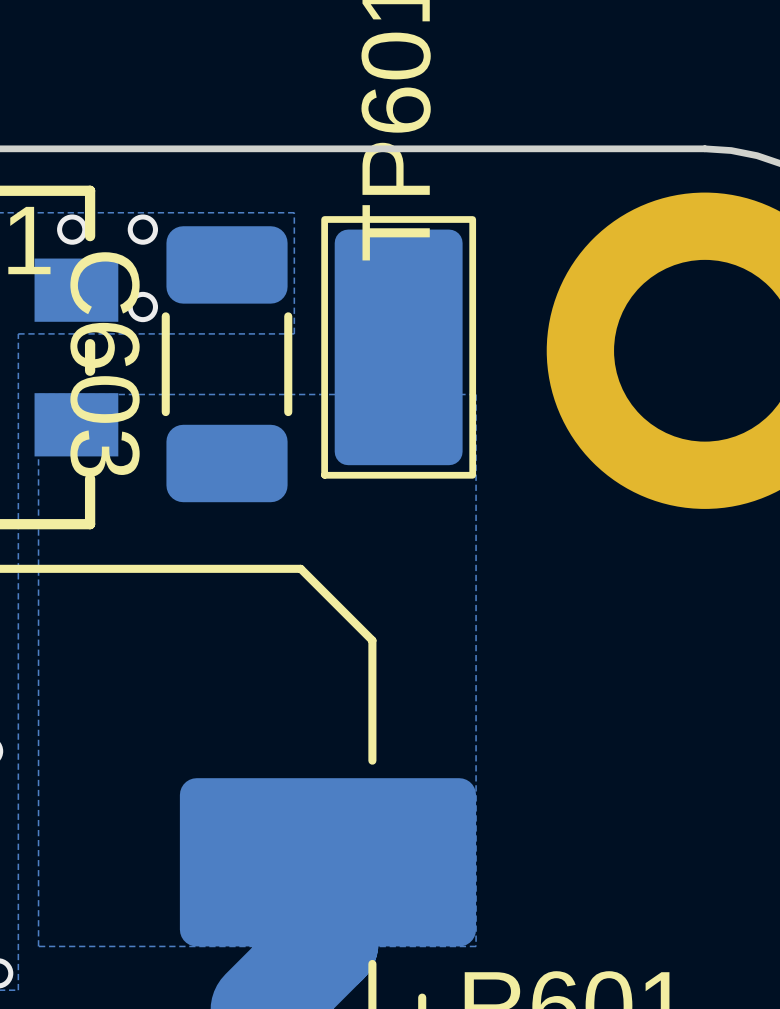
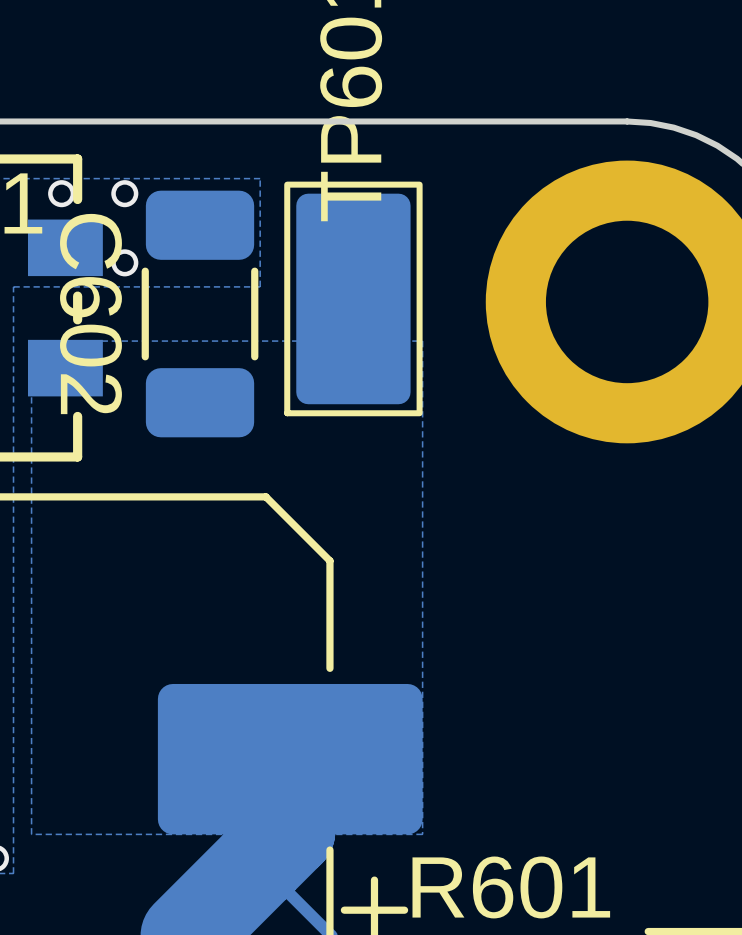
C603 name: C603 (105, 364) -> C602 (90, 314)

